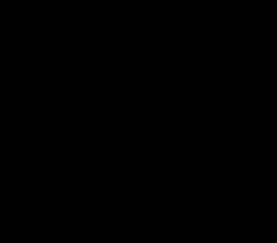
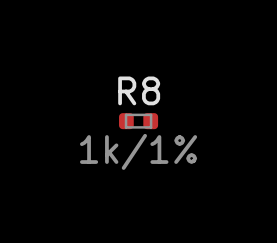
R8: none -> 1k/1% (138, 121)

